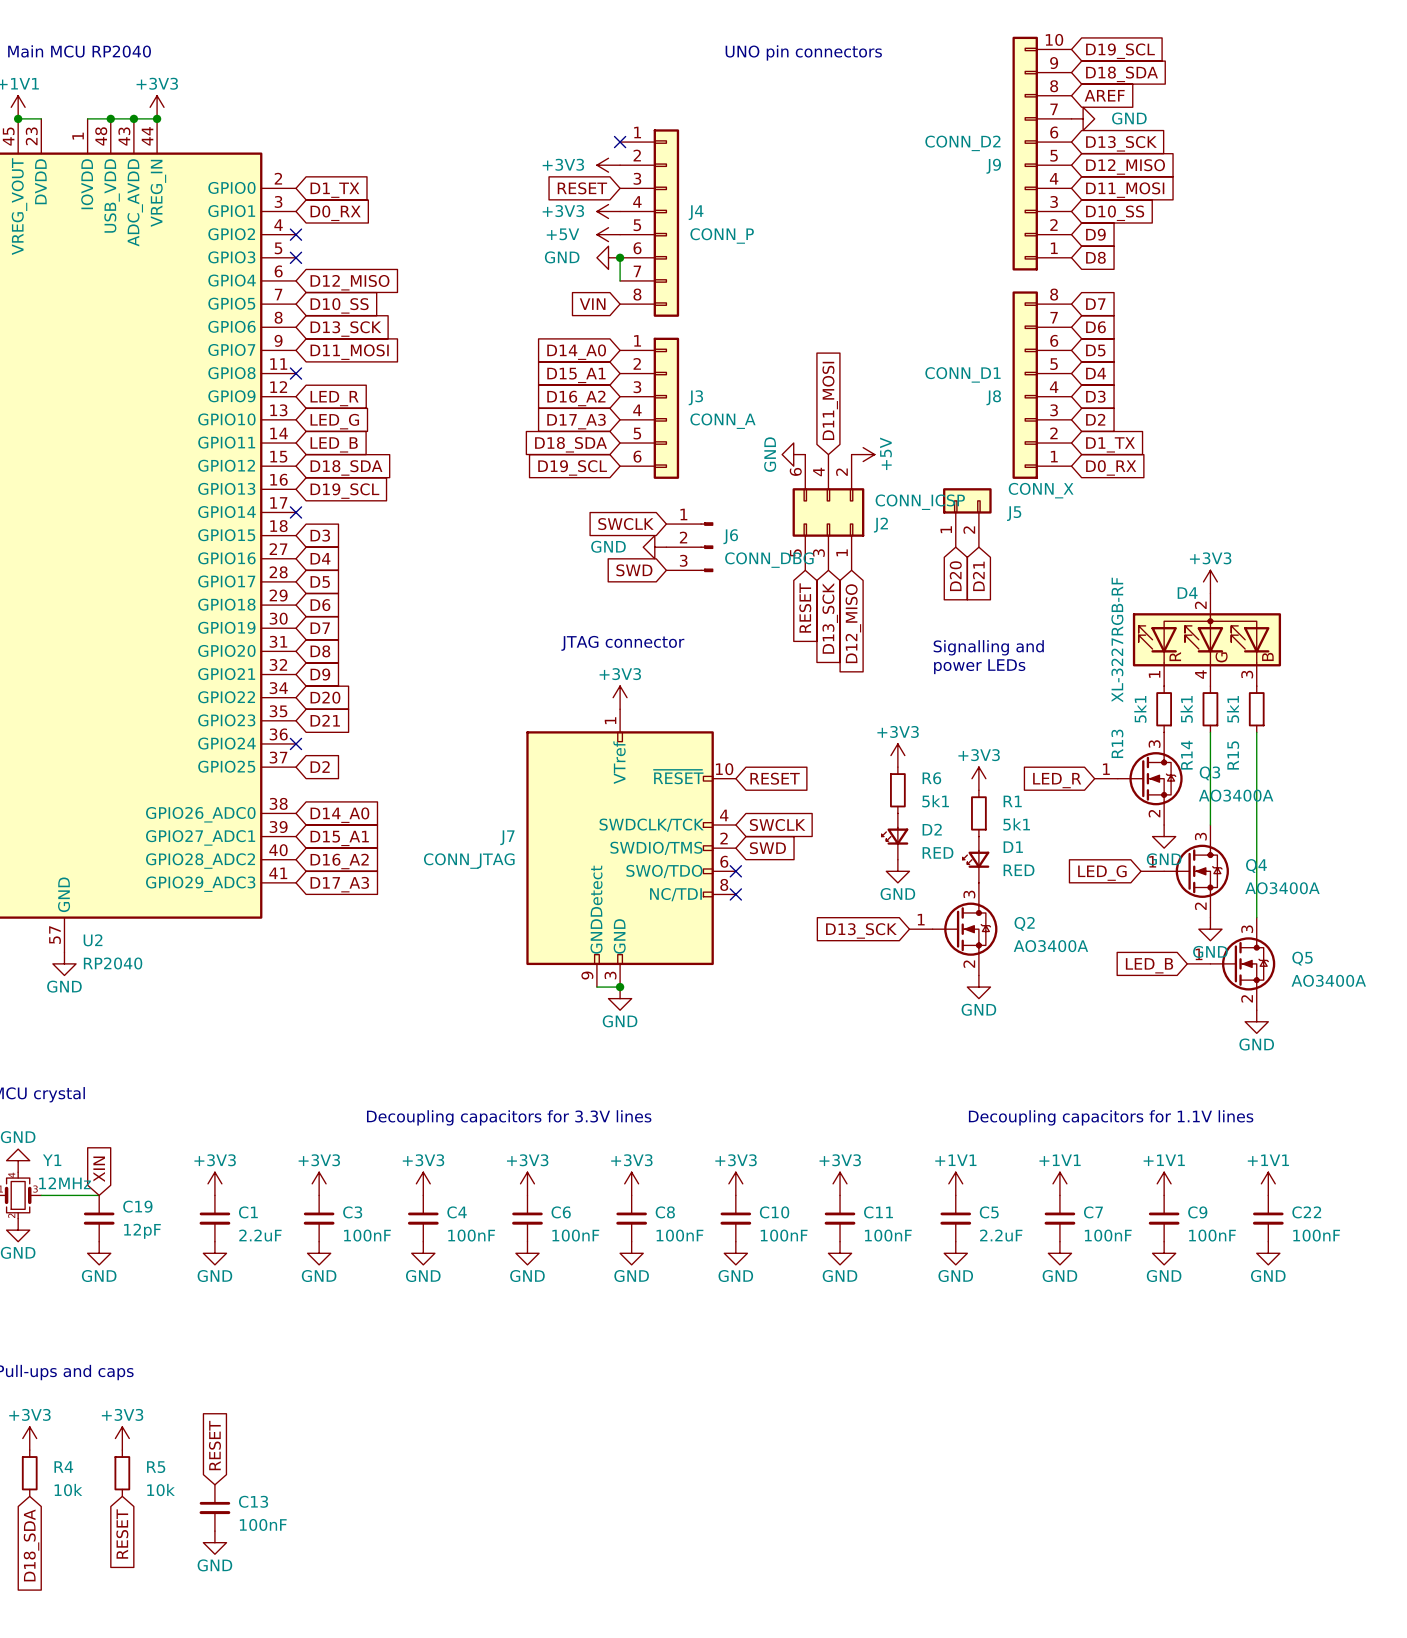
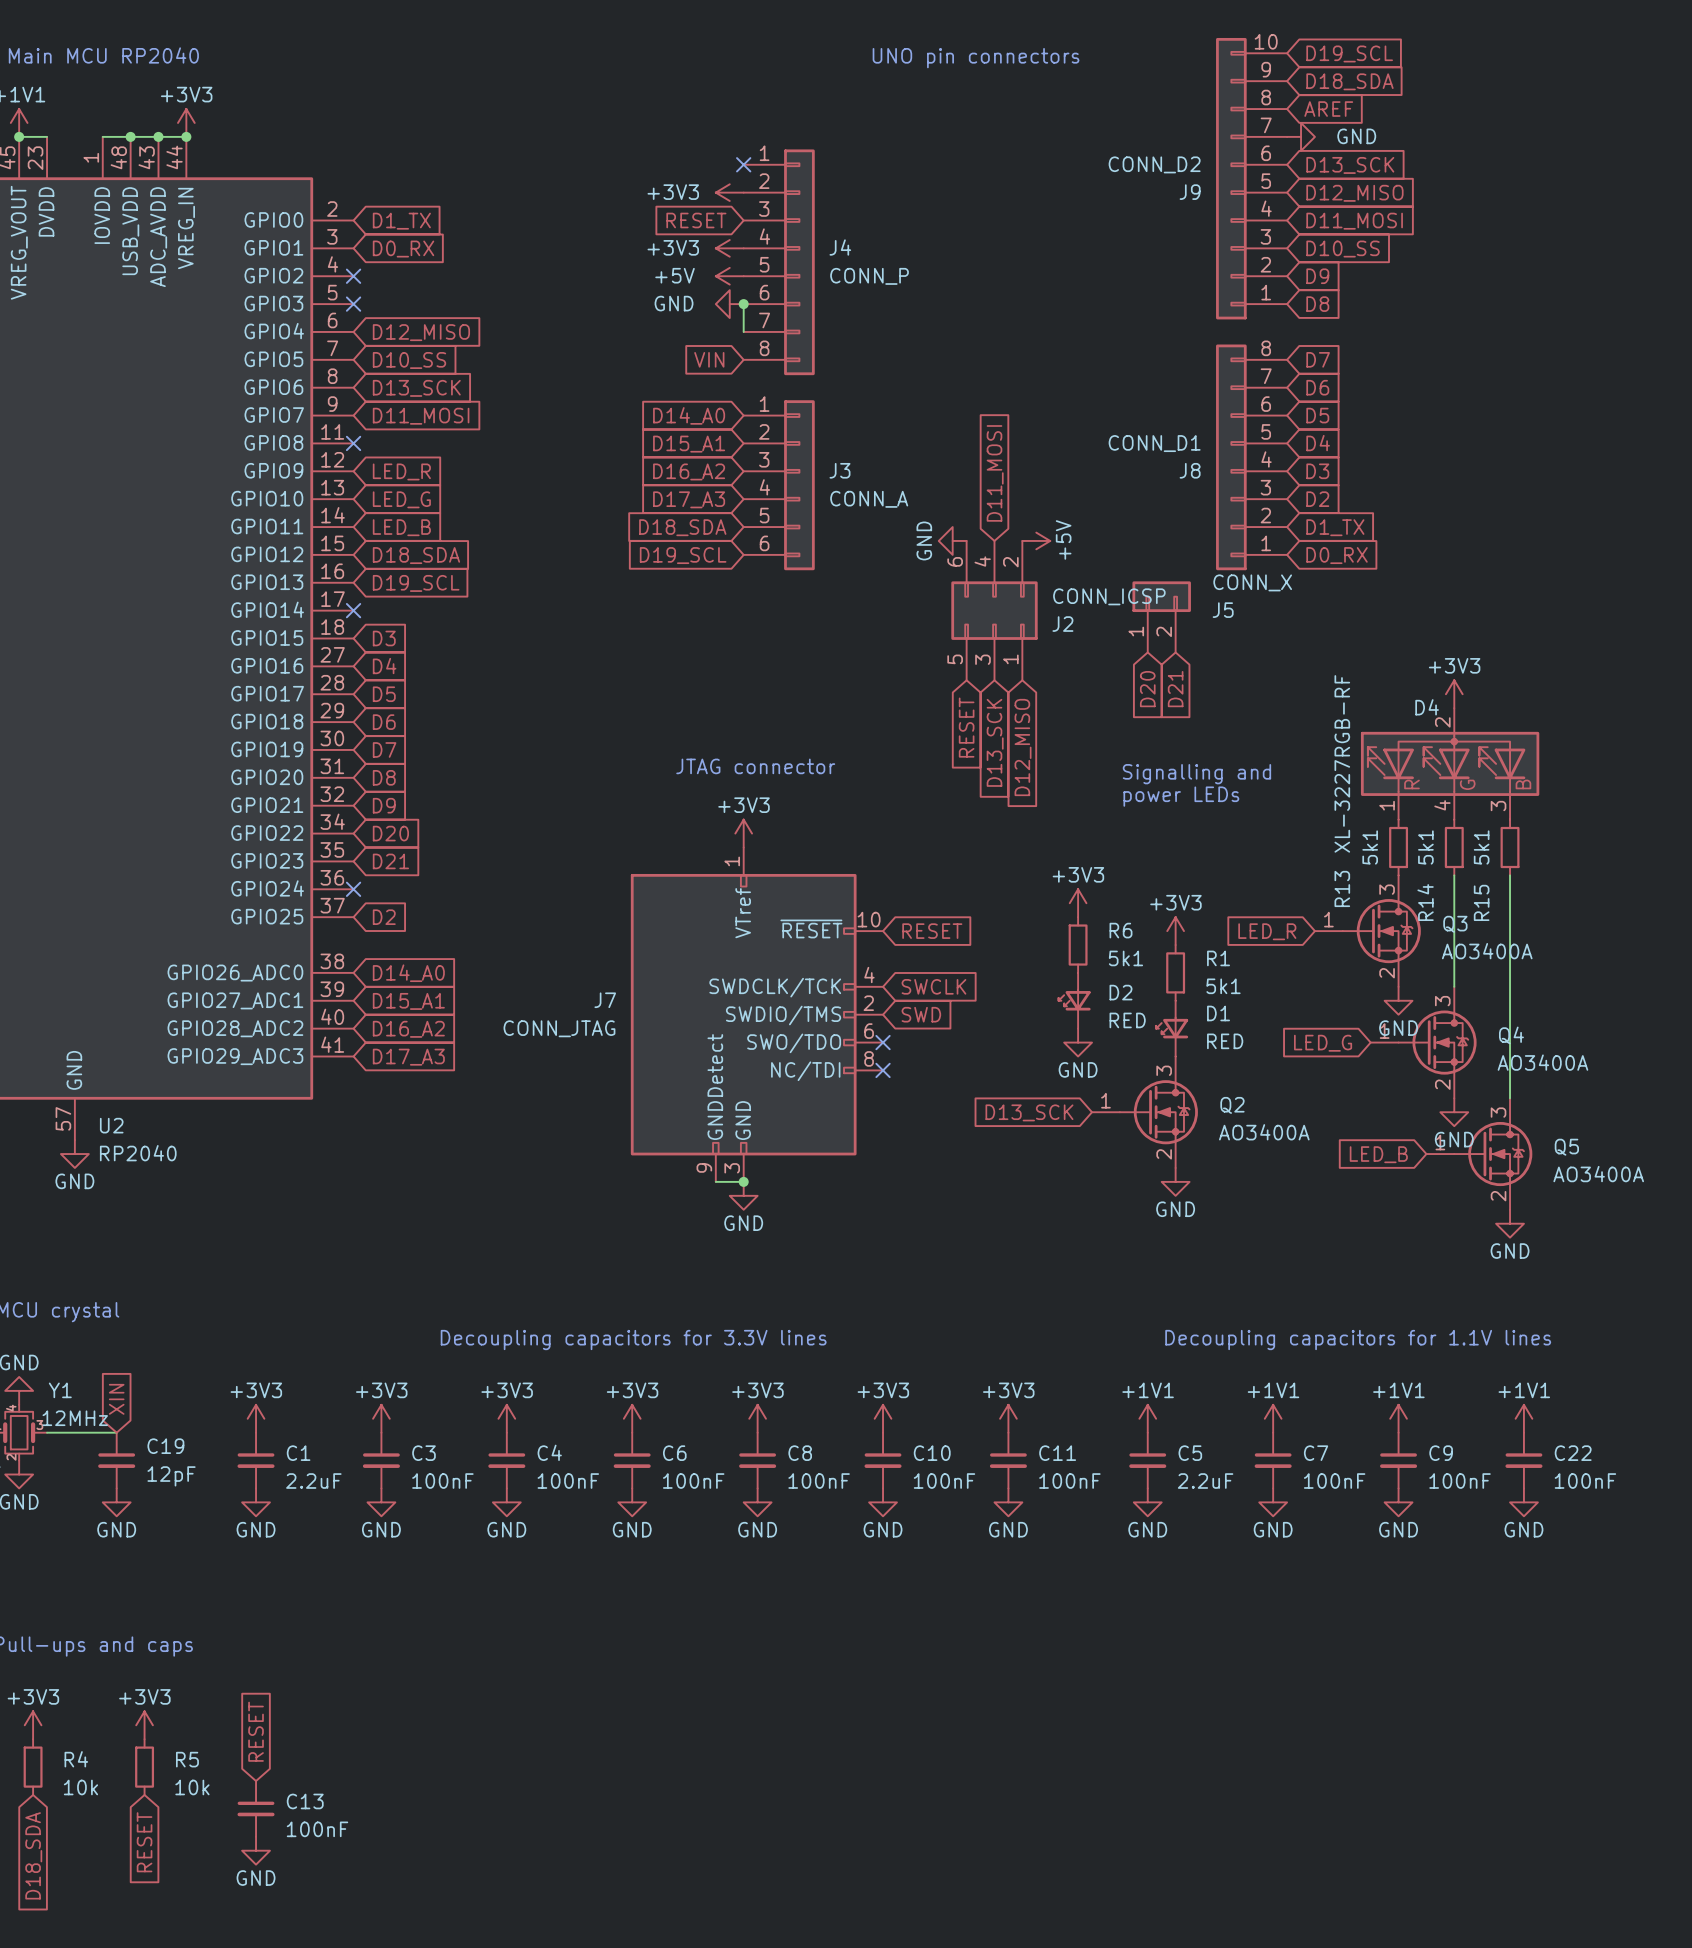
global label: SWCLK (625, 524) -> none
power symbol: GND (654, 547) -> none
J6: CONN_DBG (689, 547) -> none
global label: SWD (634, 570) -> none

